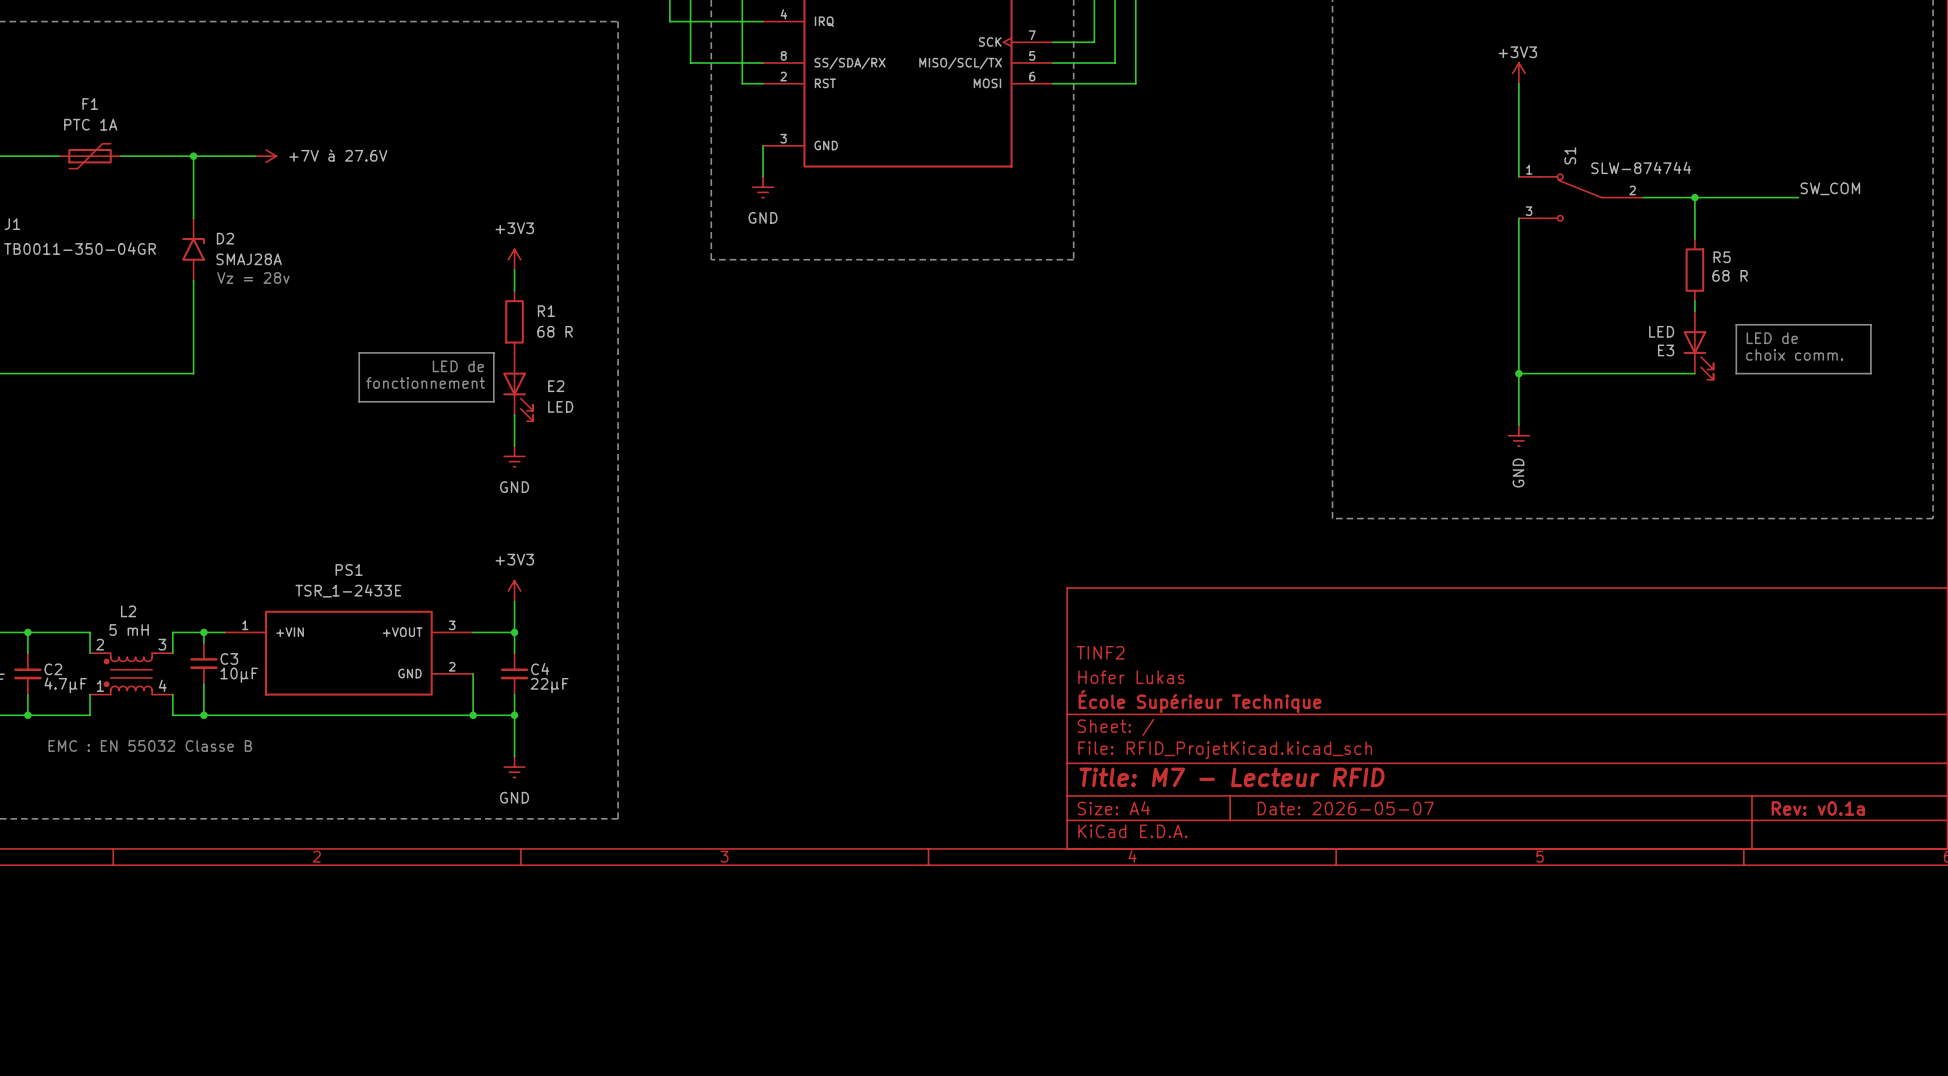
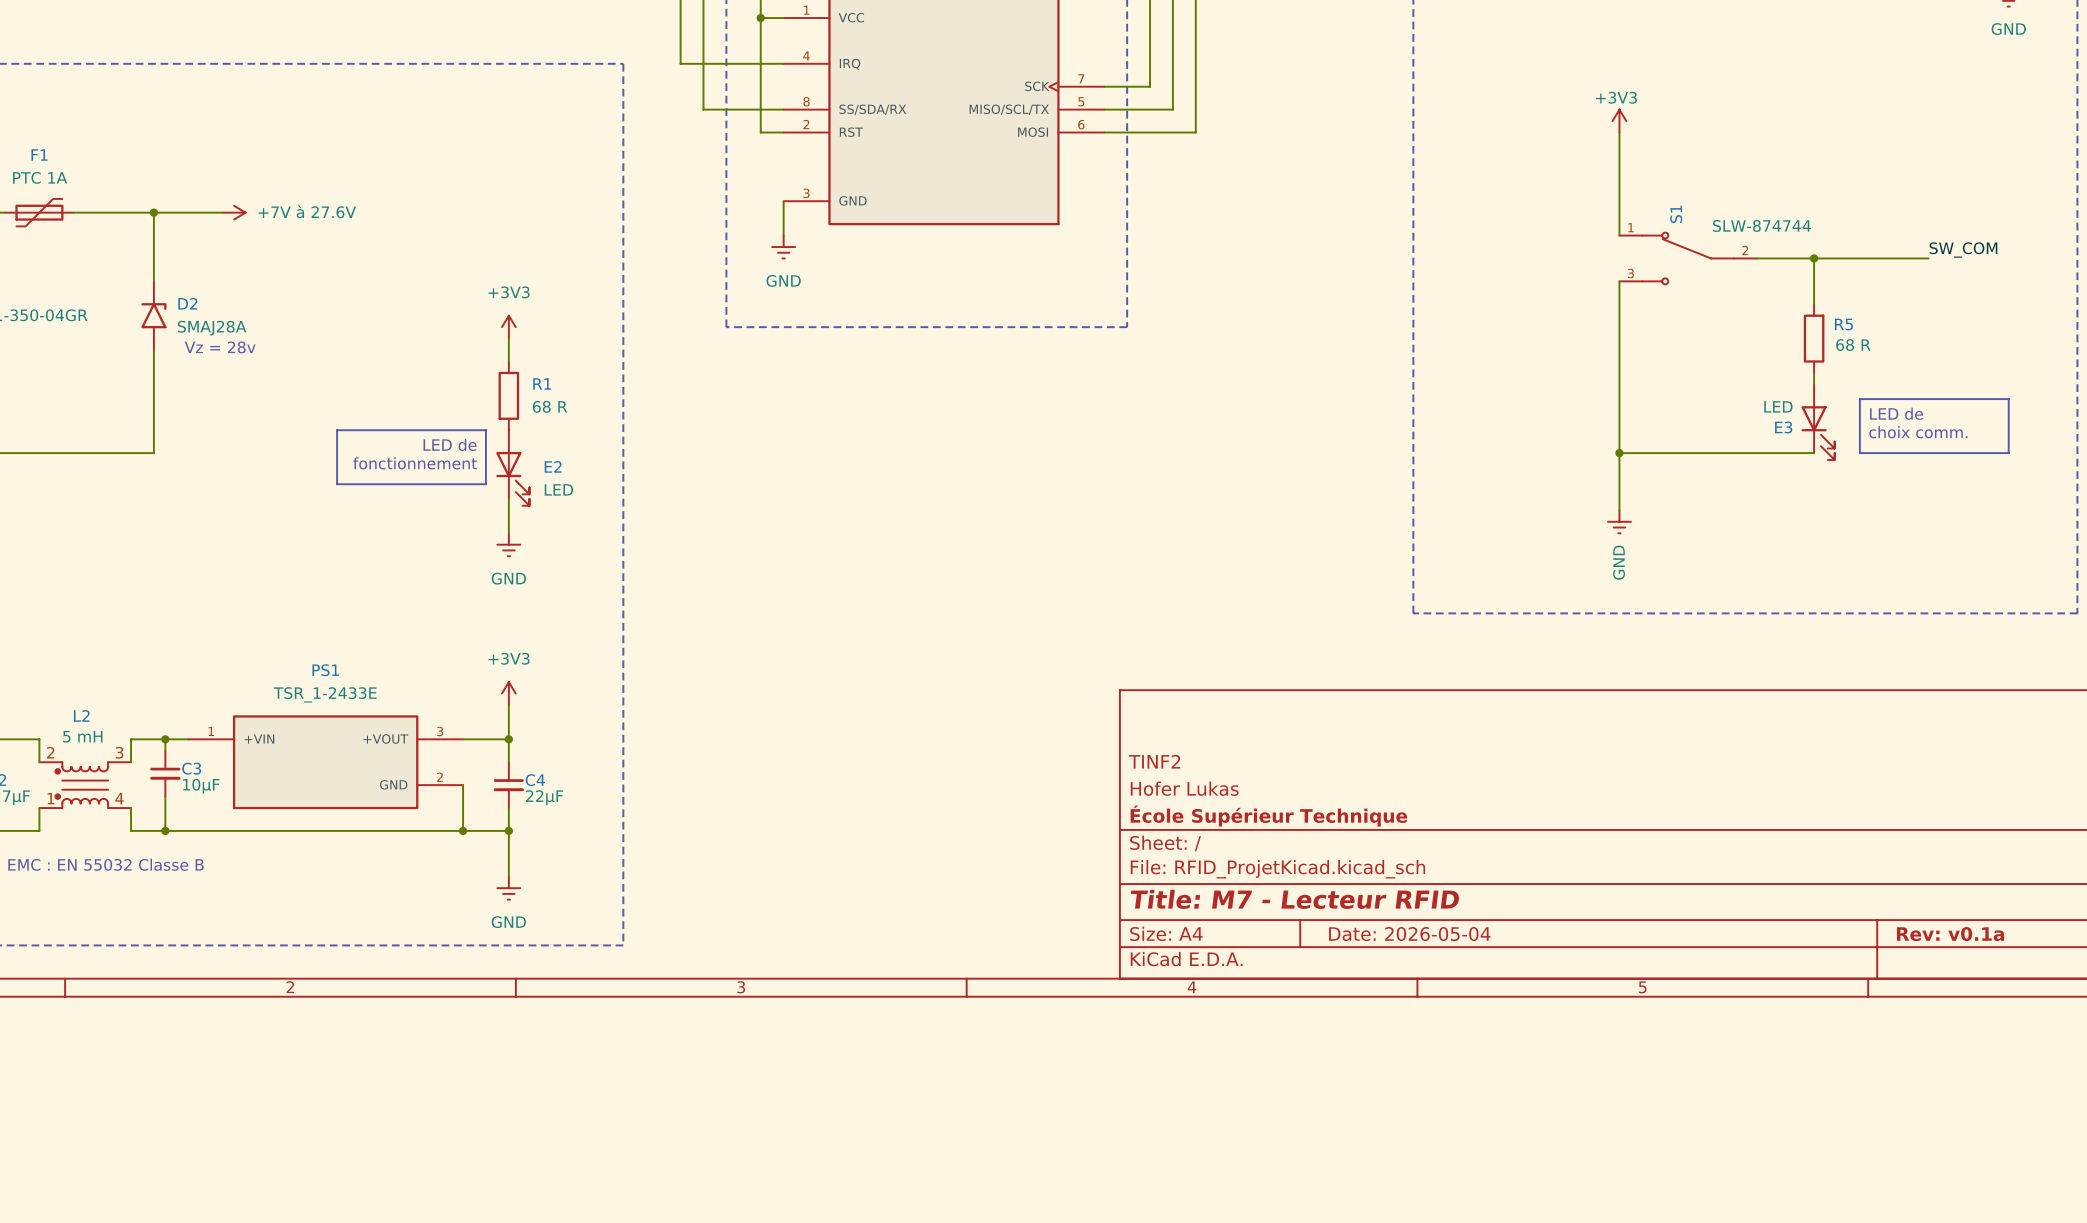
title block: Date: 2026-05-07 (1345, 808) -> Date: 2026-05-04 (1409, 934)

